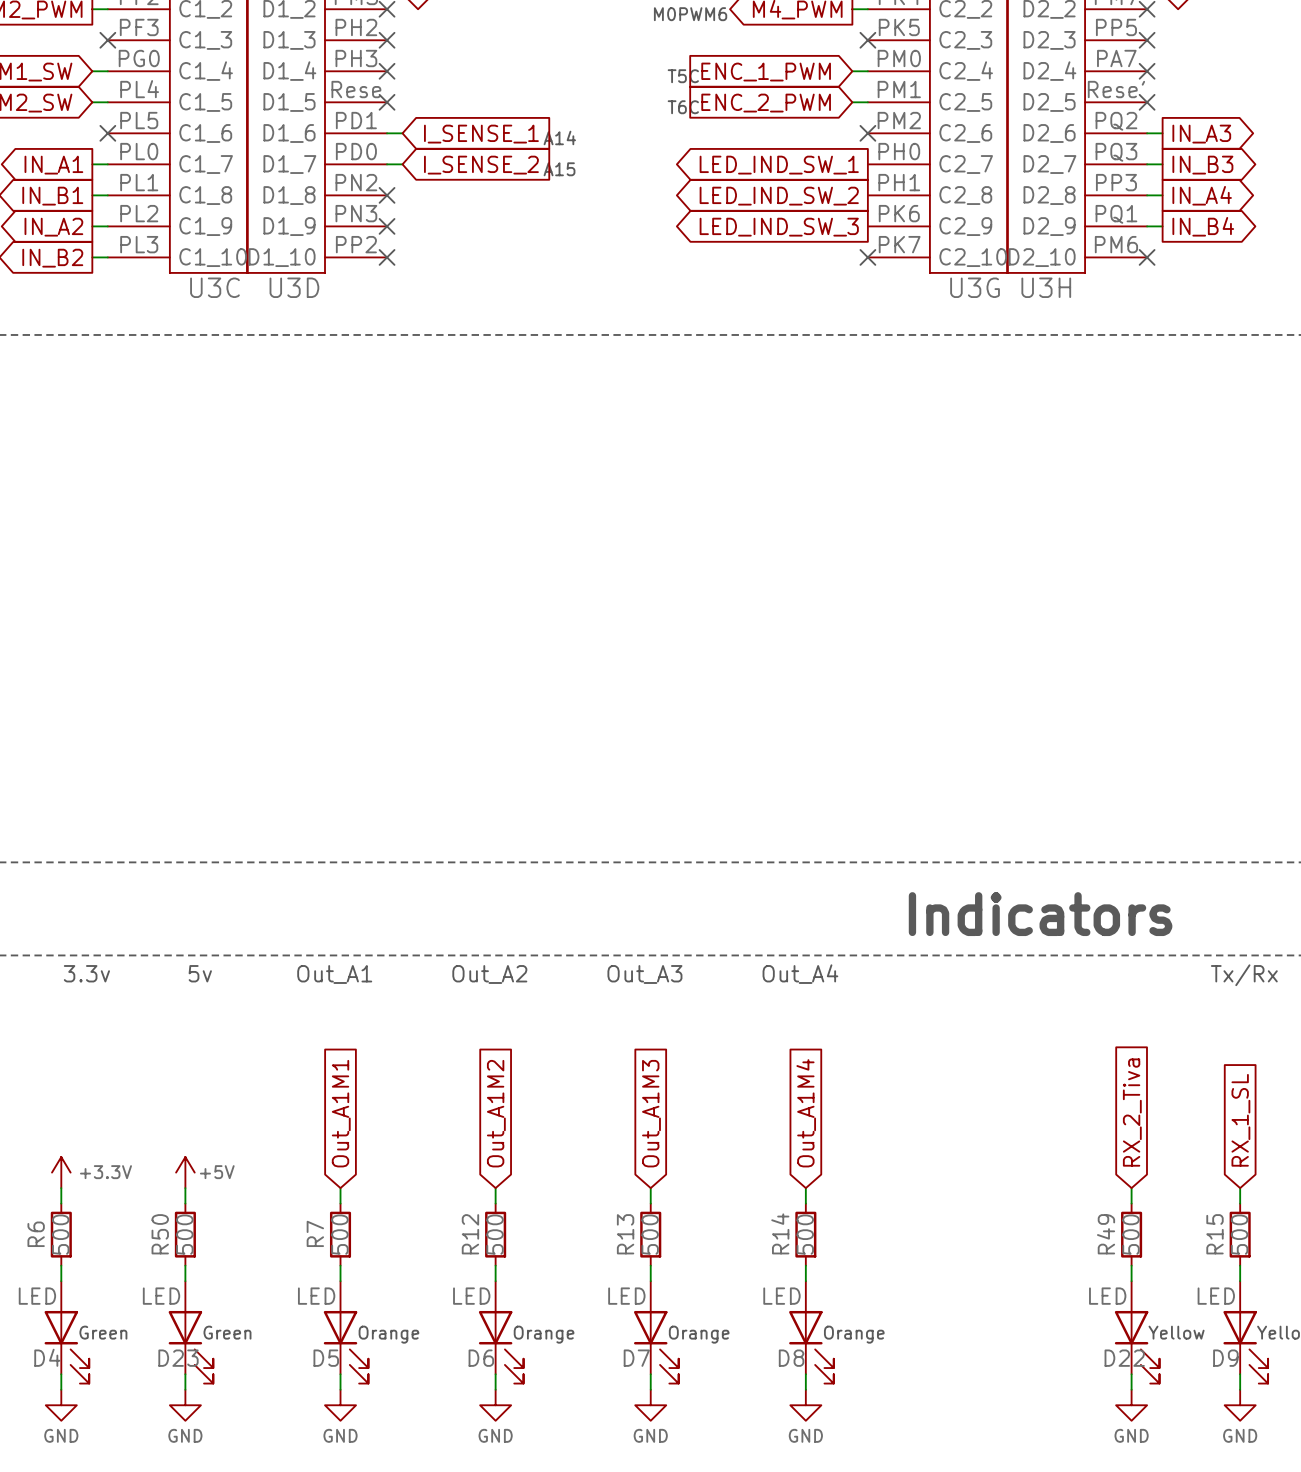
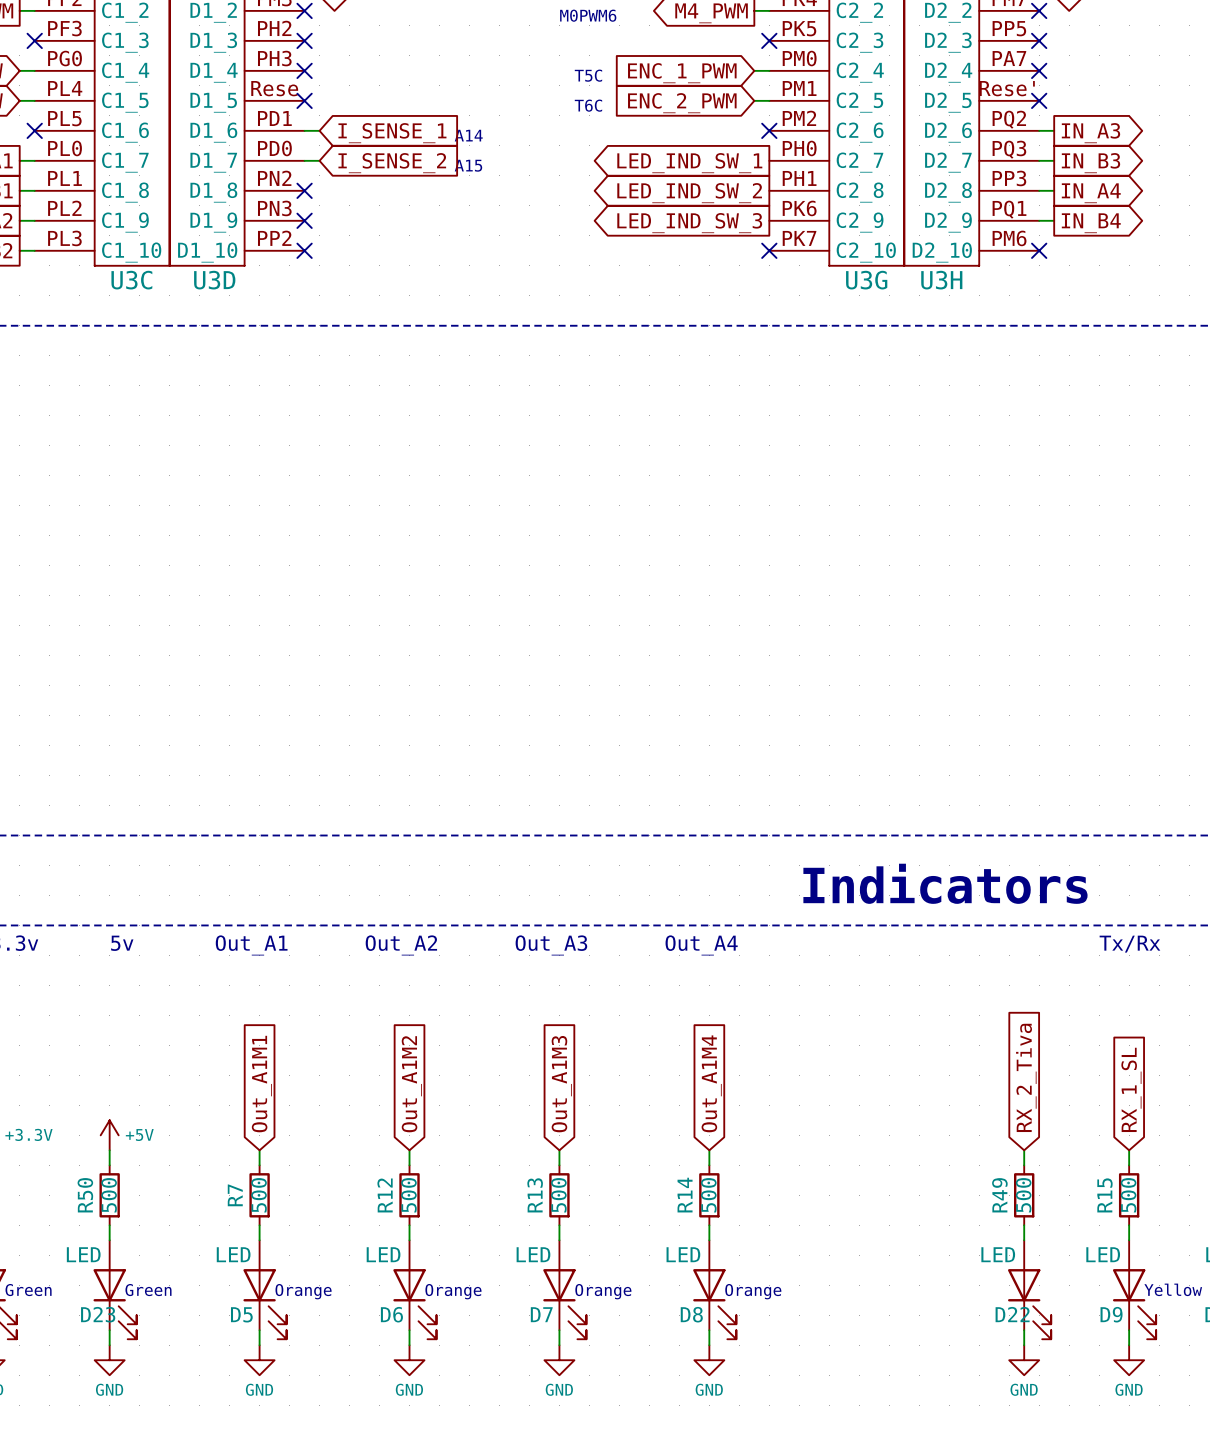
text: Yellow (1176, 1332) -> none

